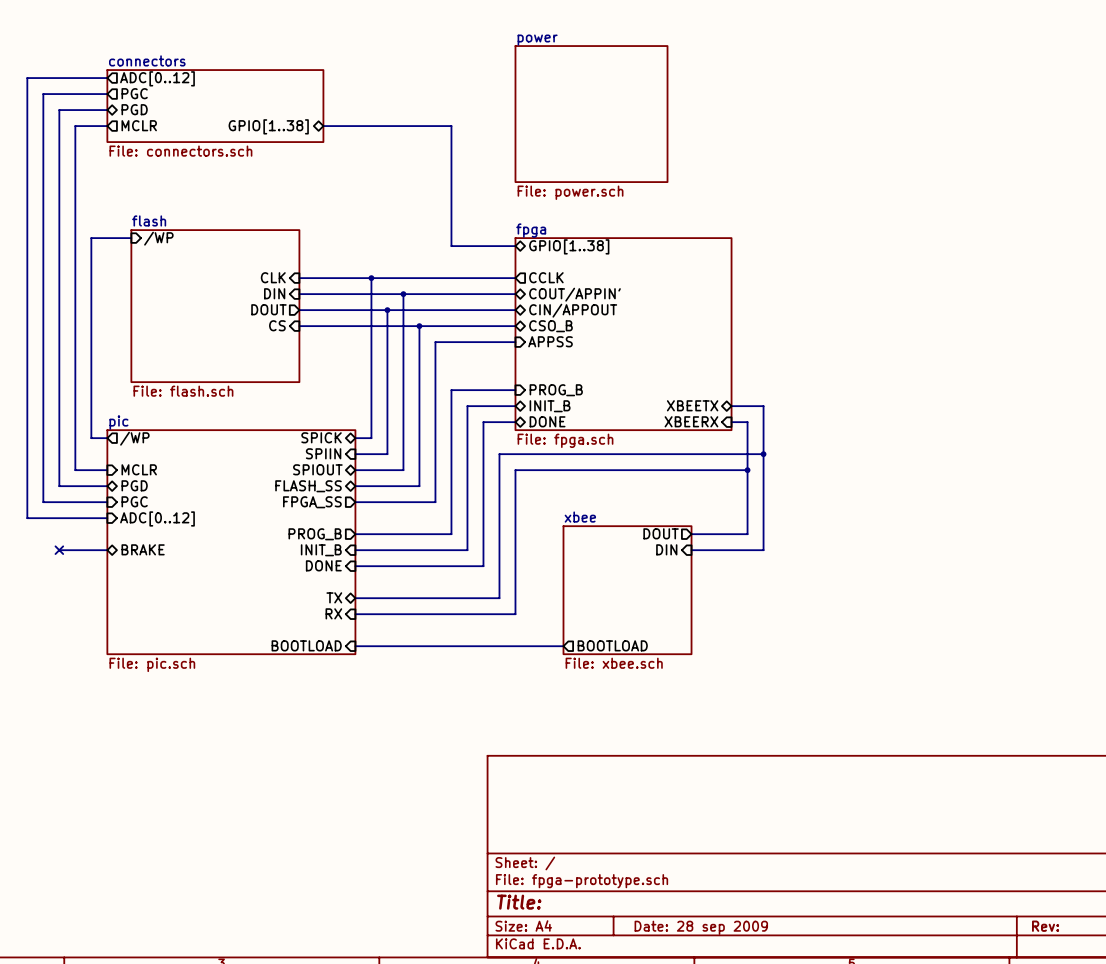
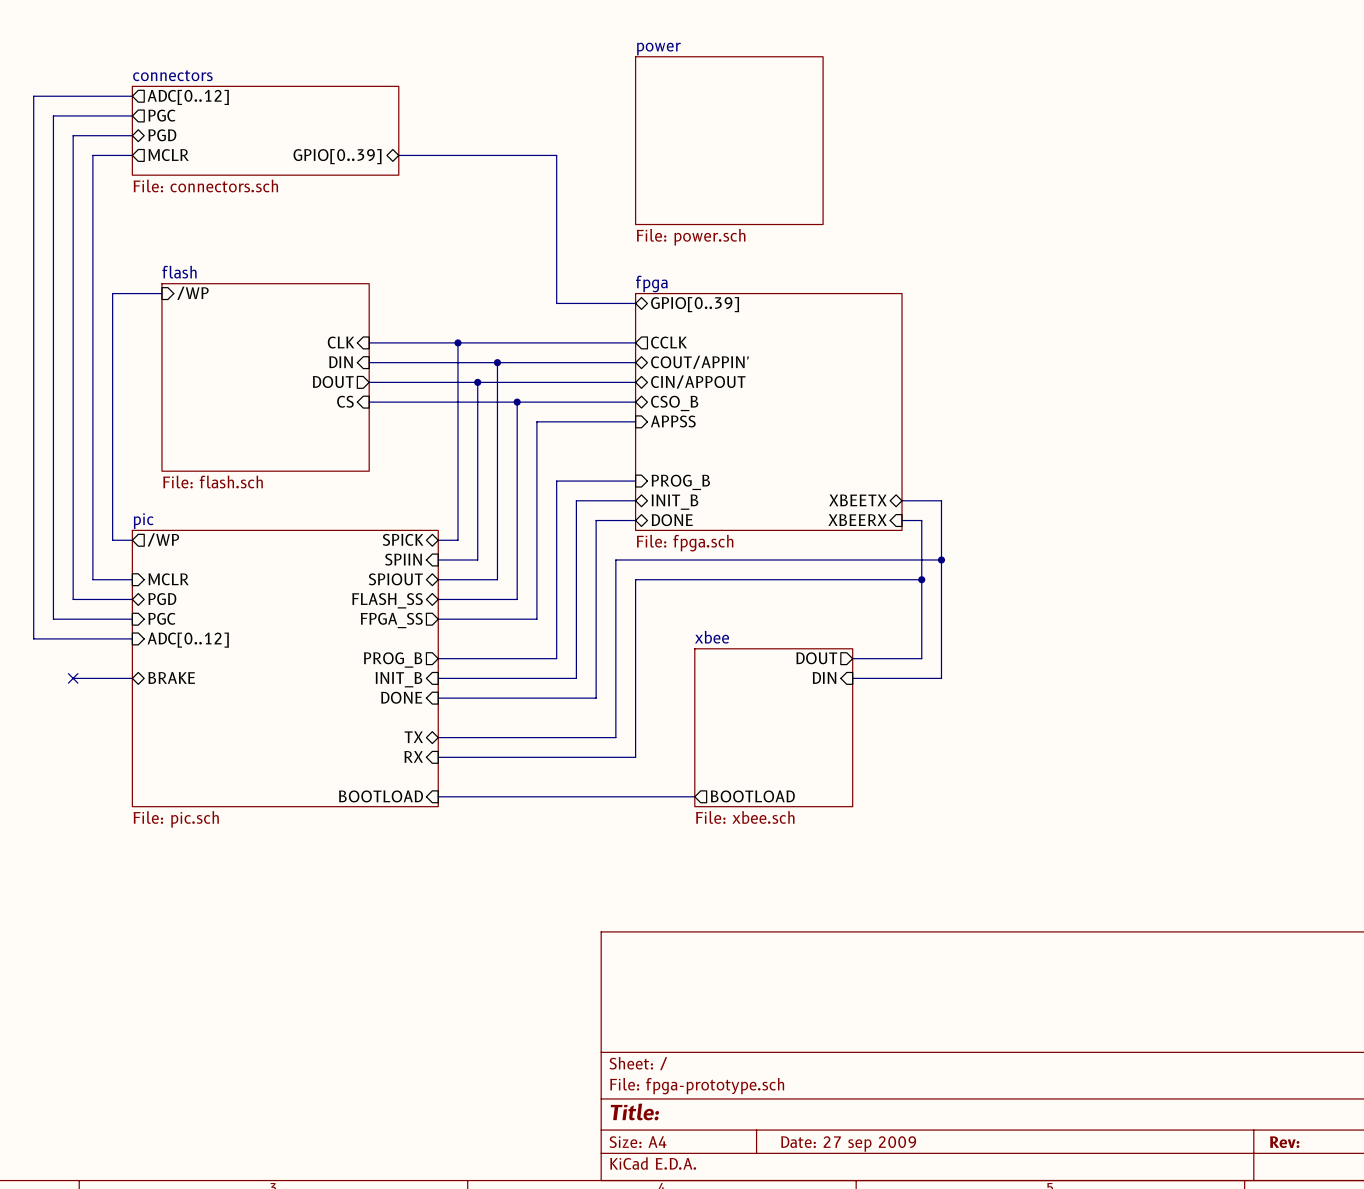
sheet pin: GPIO[1..38] (268, 126) -> GPIO[0..39] (337, 156)
sheet pin: GPIO[1..38] (569, 246) -> GPIO[0..39] (695, 304)
title block: Date: 28 sep 2009 (701, 927) -> Date: 27 sep 2009 (848, 1143)

